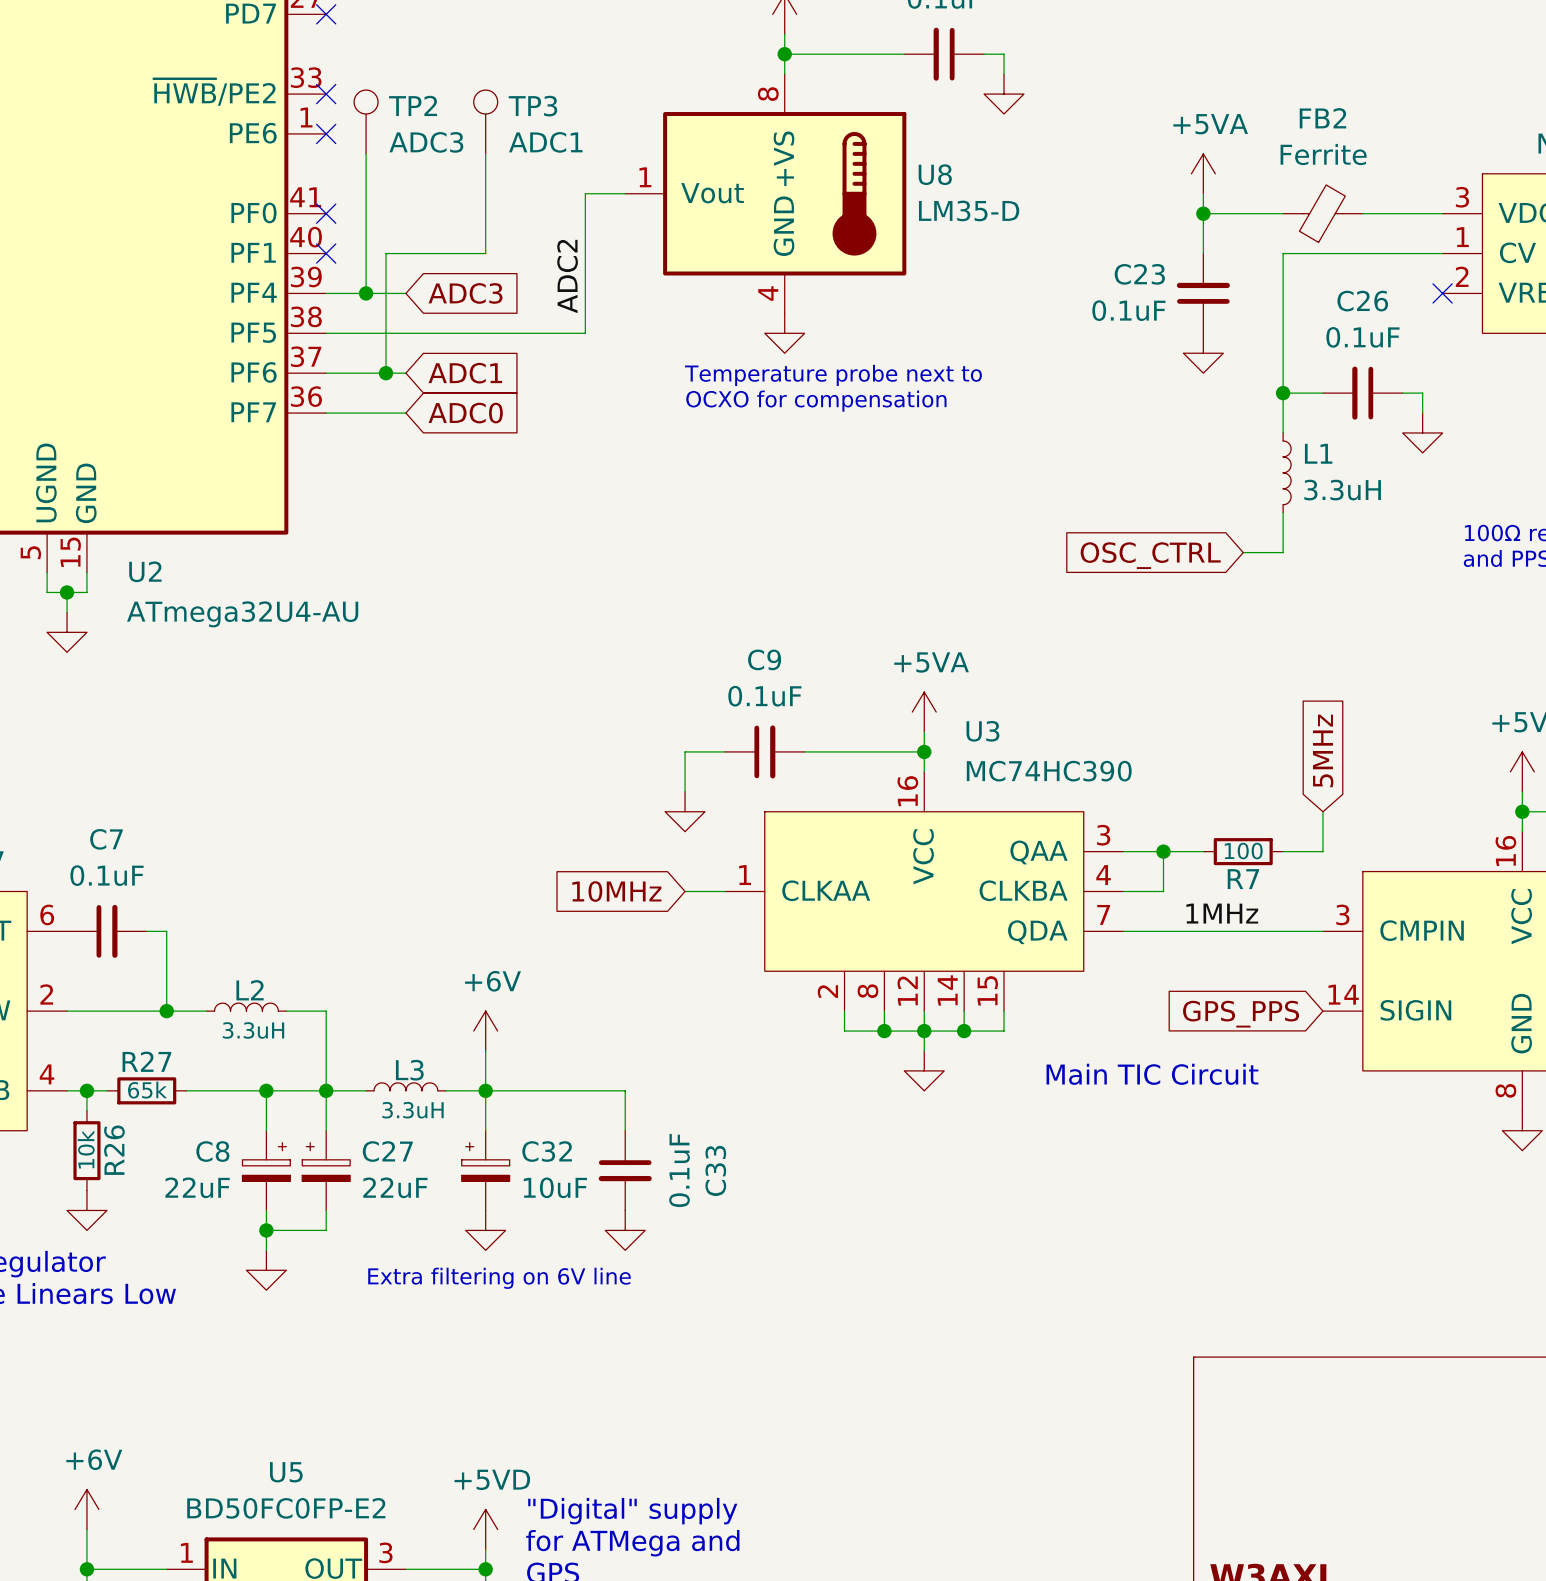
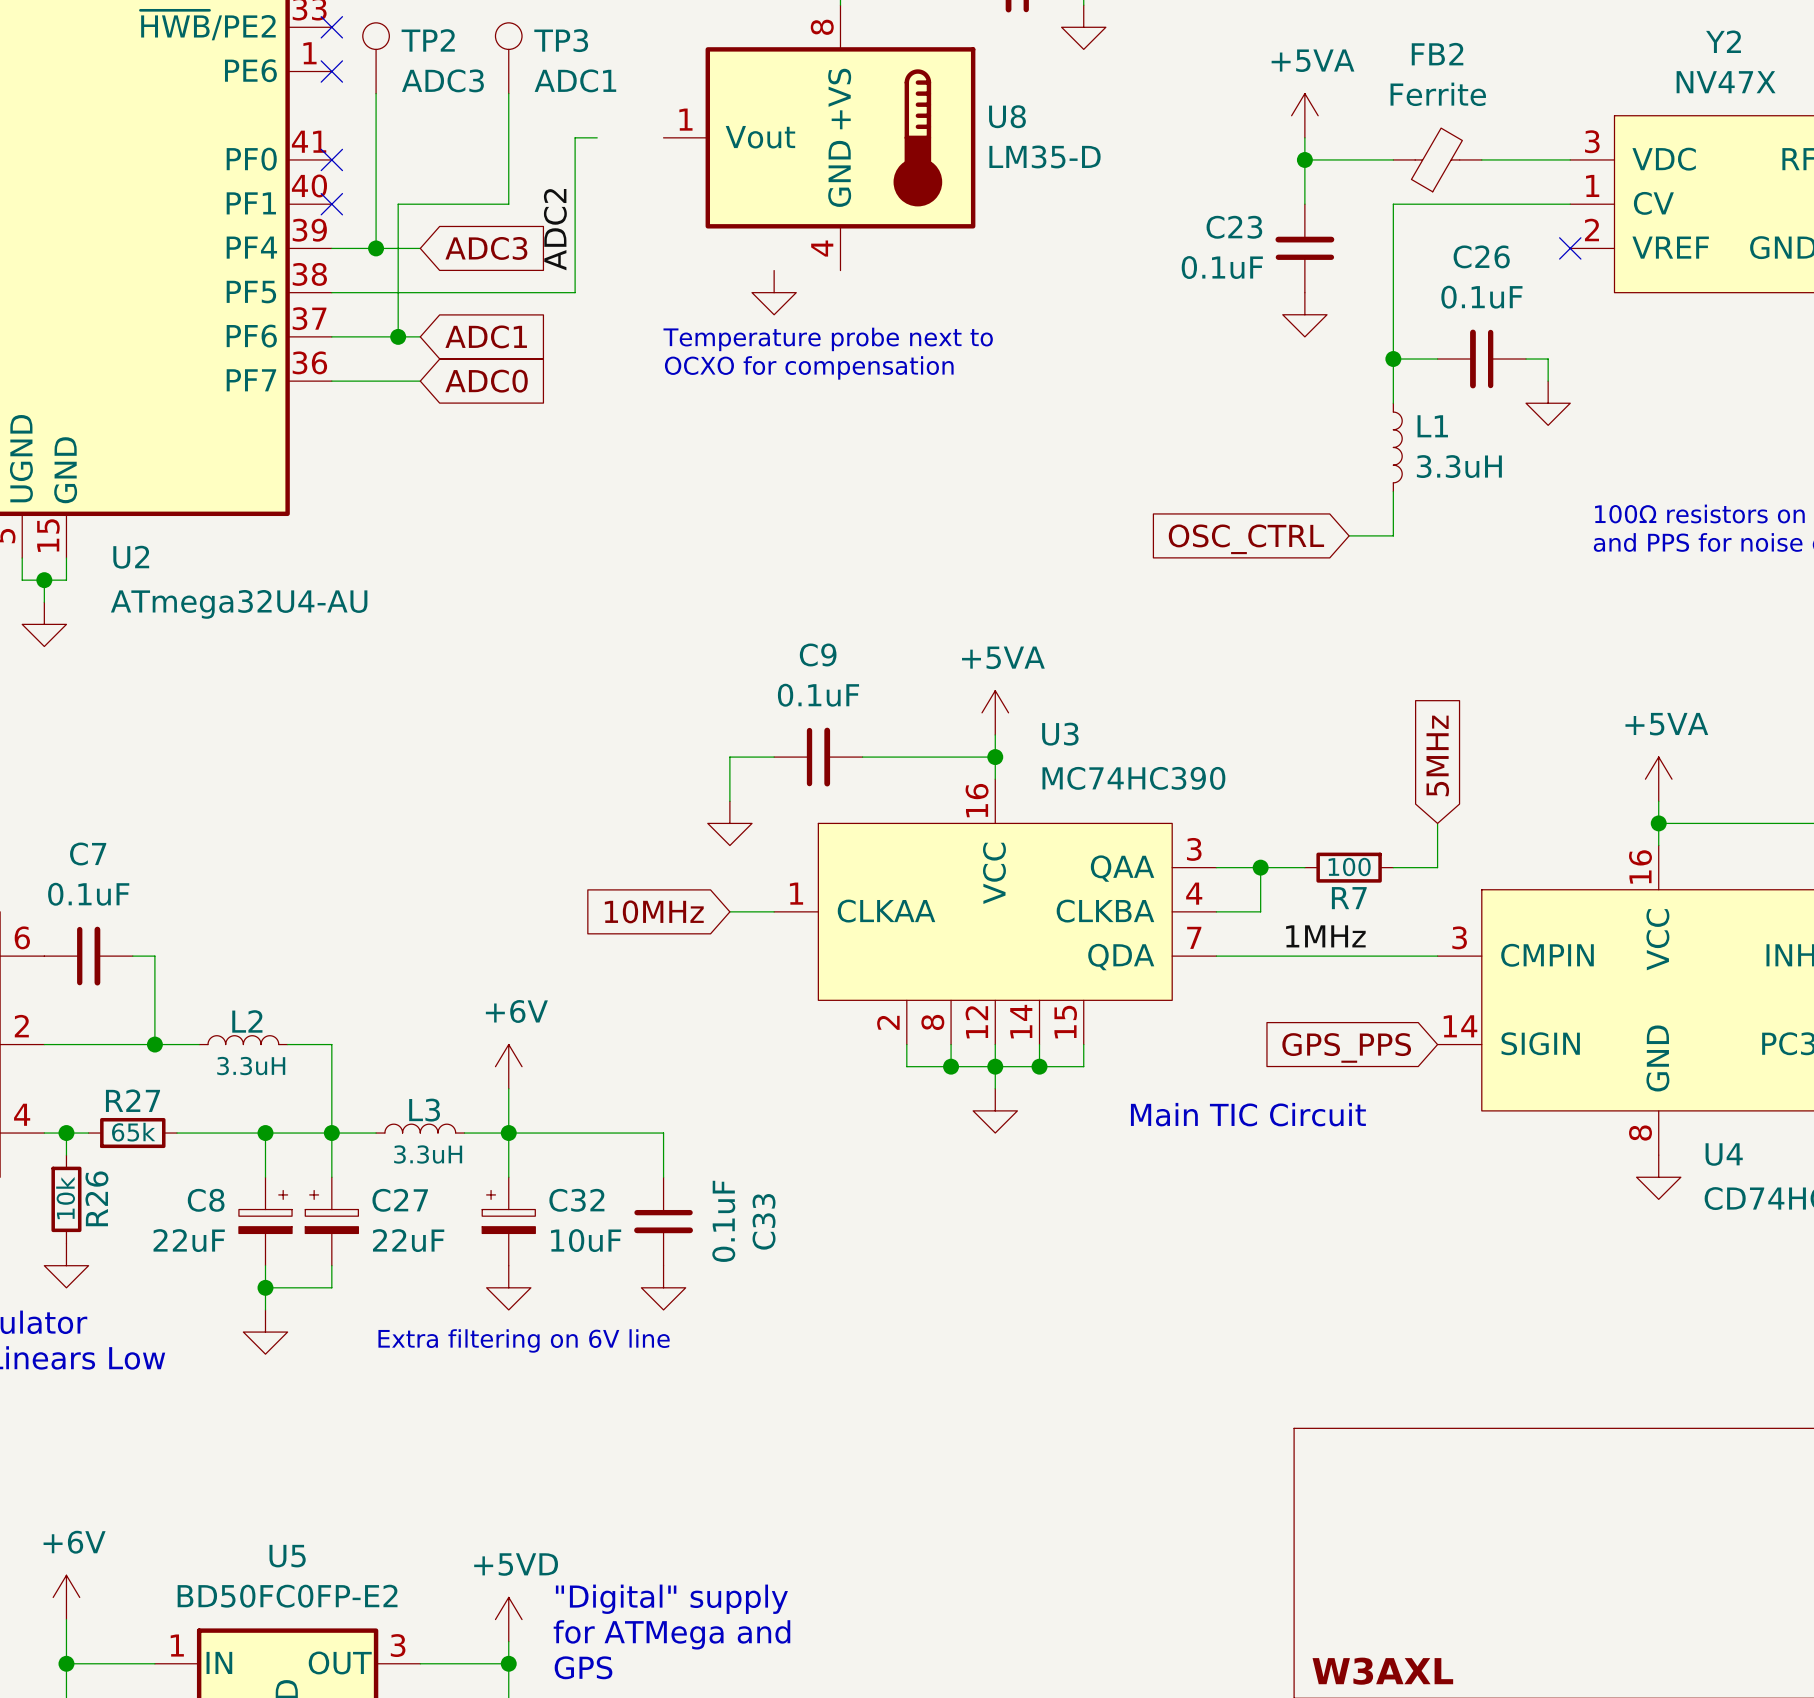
wire: (625, 193) (585, 193) (585, 333) (545, 333) -> (597, 137) (575, 137) (575, 292)
label position: ADC2 (567, 276) -> ADC2 (555, 229)
power symbol position: (784, 333) -> (774, 292)
text position: Temperature probe next to (833, 375) -> Temperature probe next to (828, 339)
text position: OCXO for compensation (816, 401) -> OCXO for compensation (809, 367)

